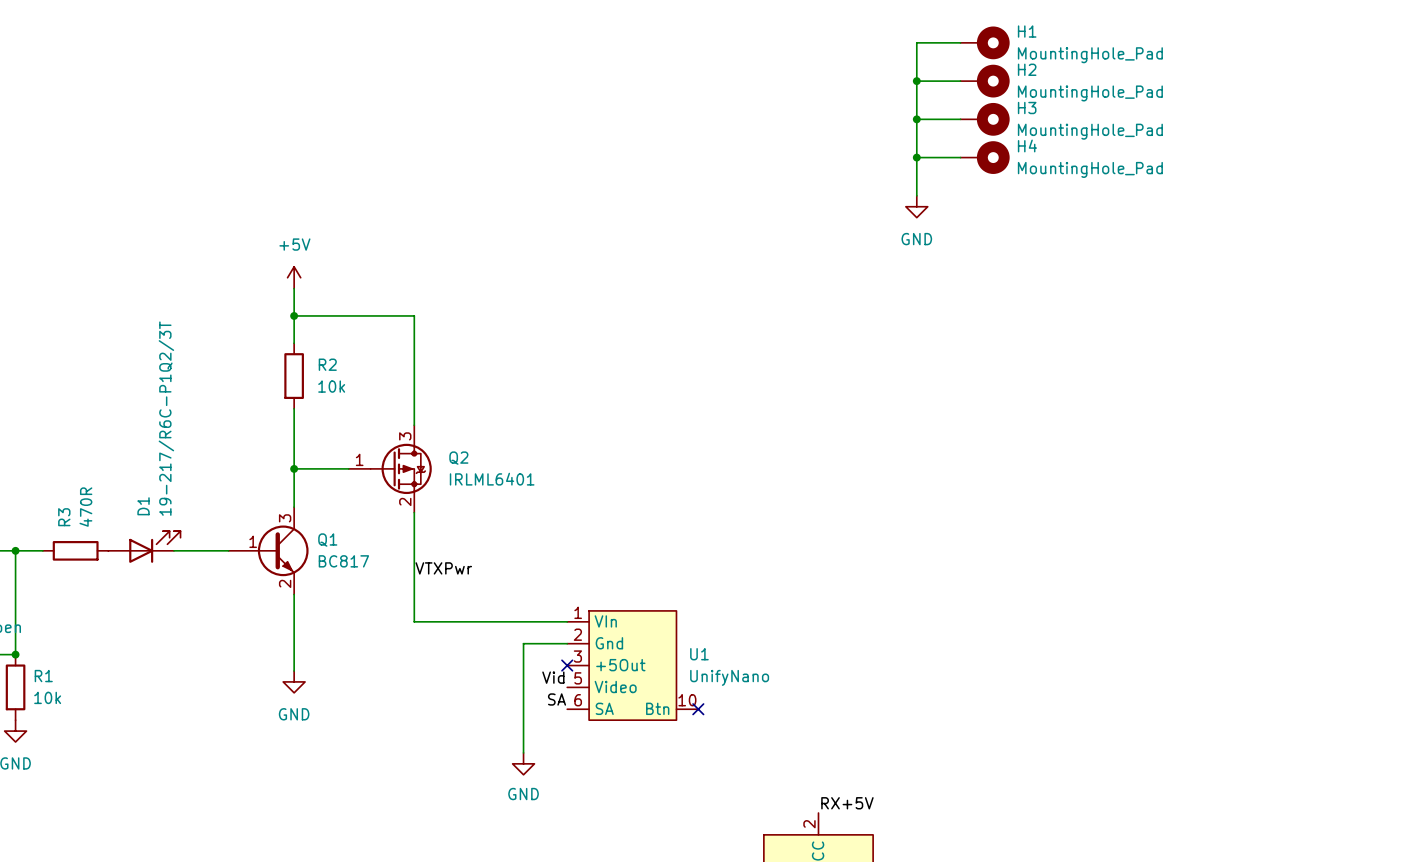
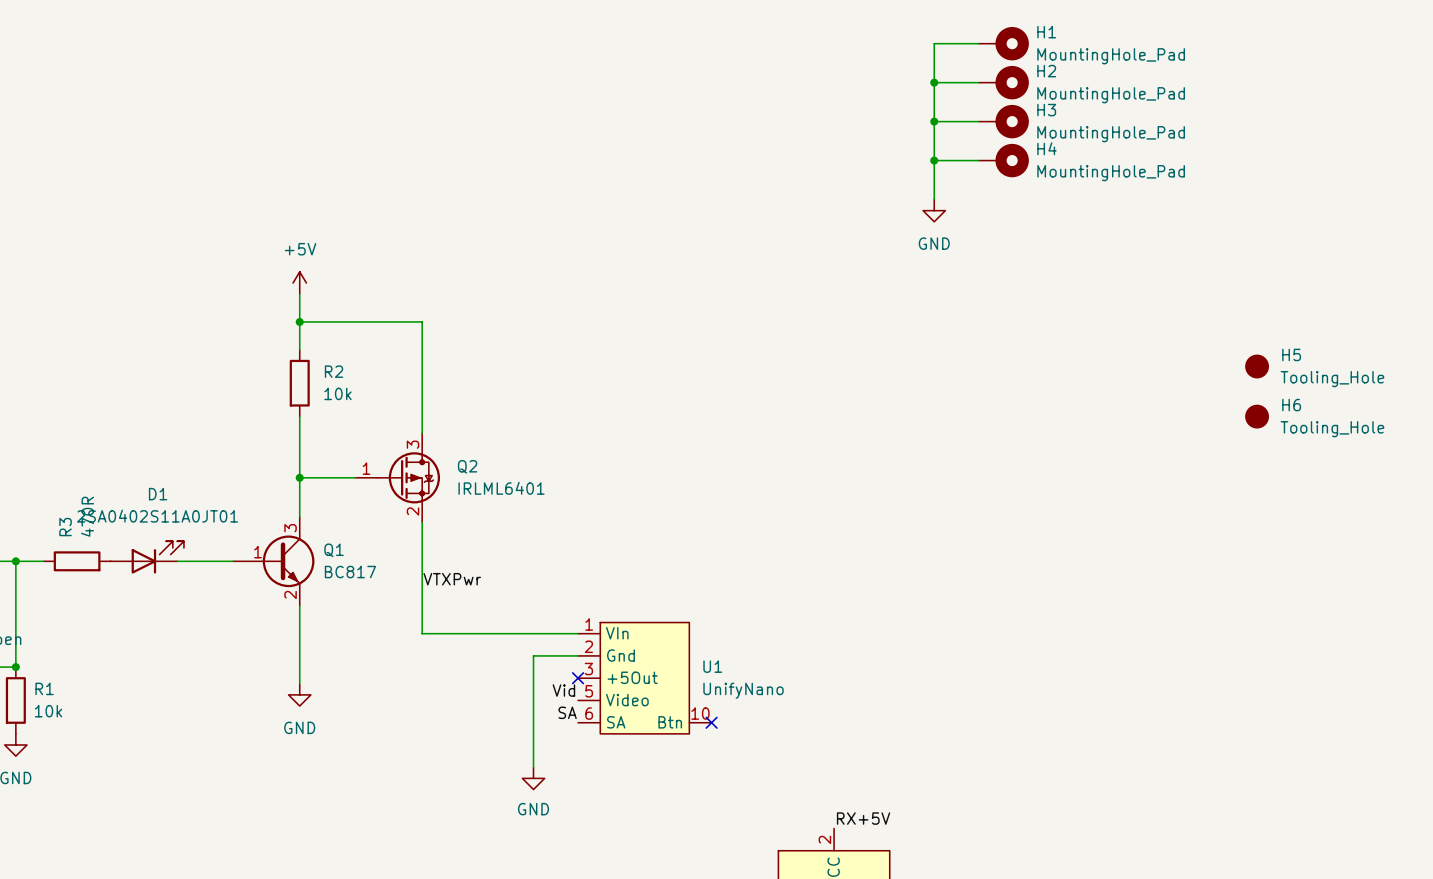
H5: none -> Tooling_Hole (1257, 366)
H6: none -> Tooling_Hole (1257, 416)
D1 value: 19-217/R6C-P1Q2/3T (166, 418) -> 2SA0402S11A0JT01 (157, 516)
D1 name rotation: 0° (143, 506) -> 90° clockwise (158, 494)

